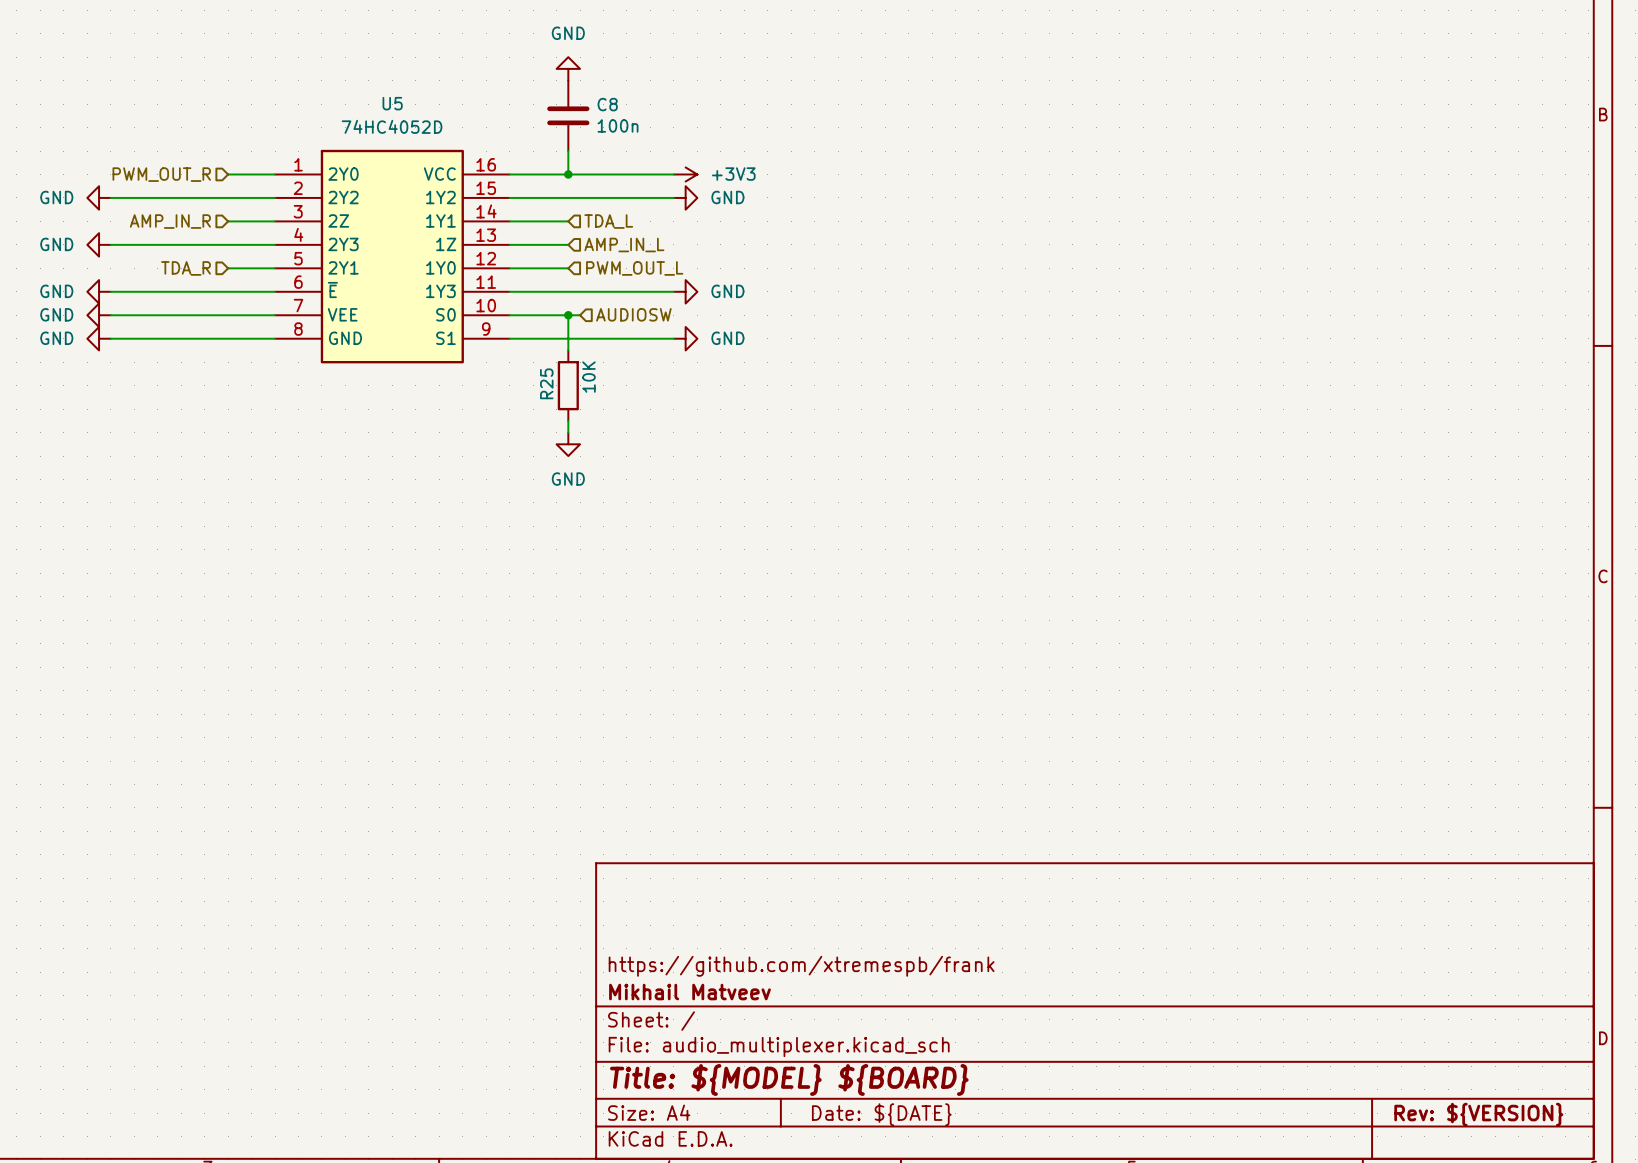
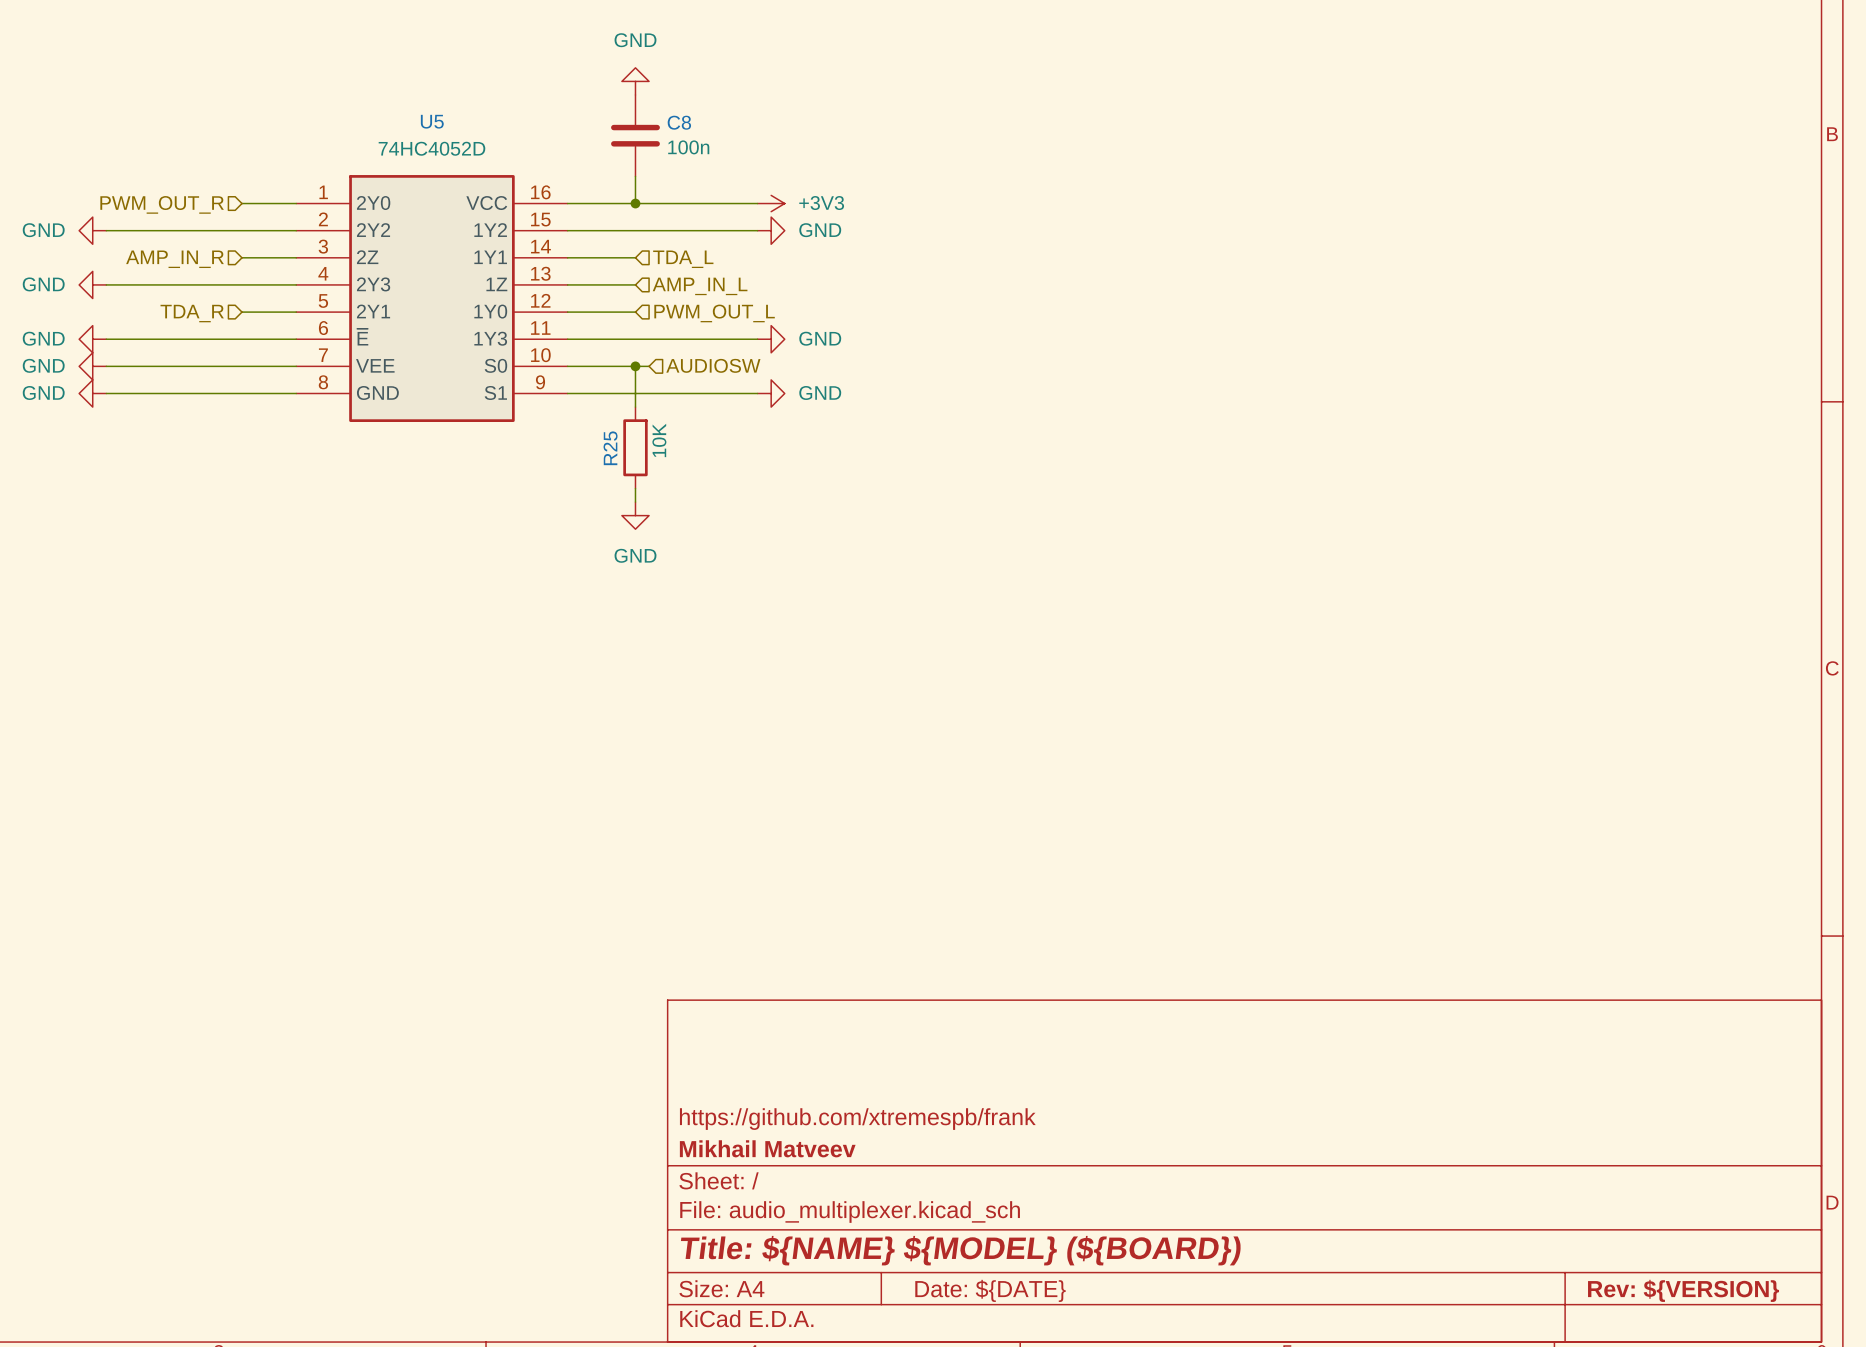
title block: Title: ${MODEL} ${BOARD} (789, 1079) -> Title: ${NAME} ${MODEL} (${BOARD}) (960, 1250)

